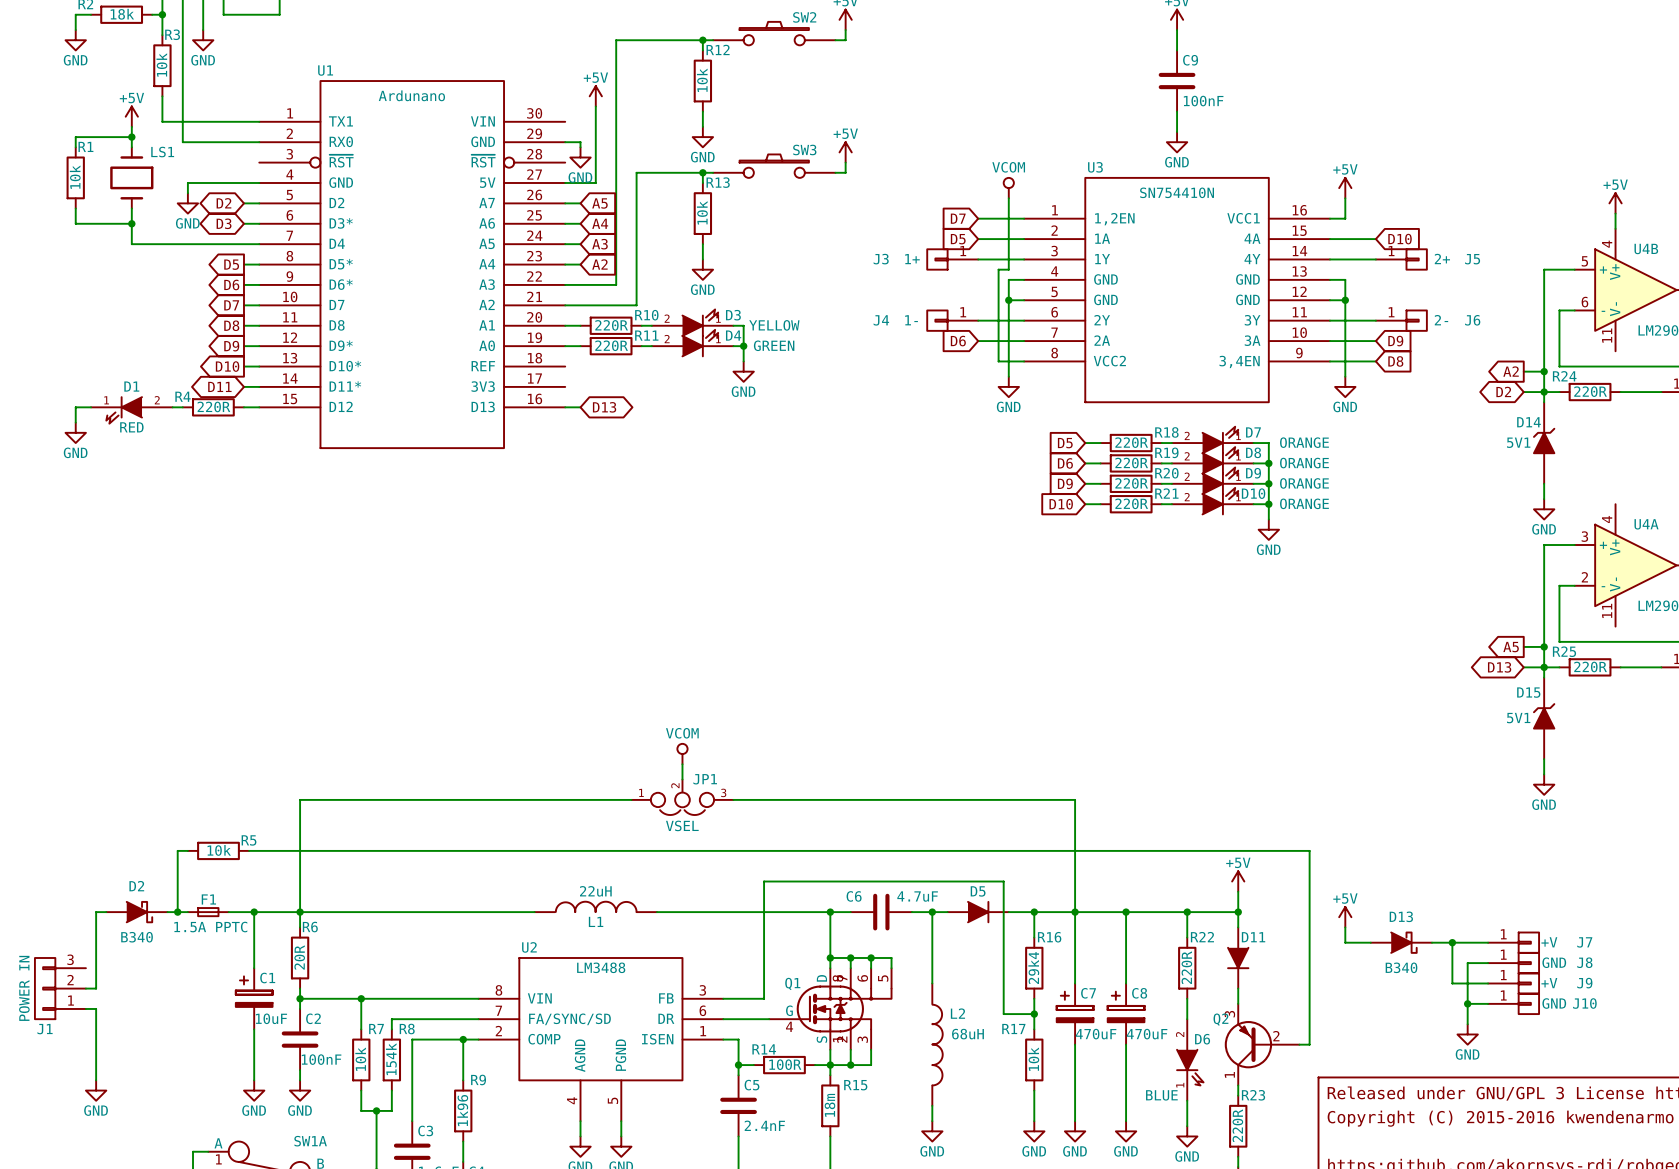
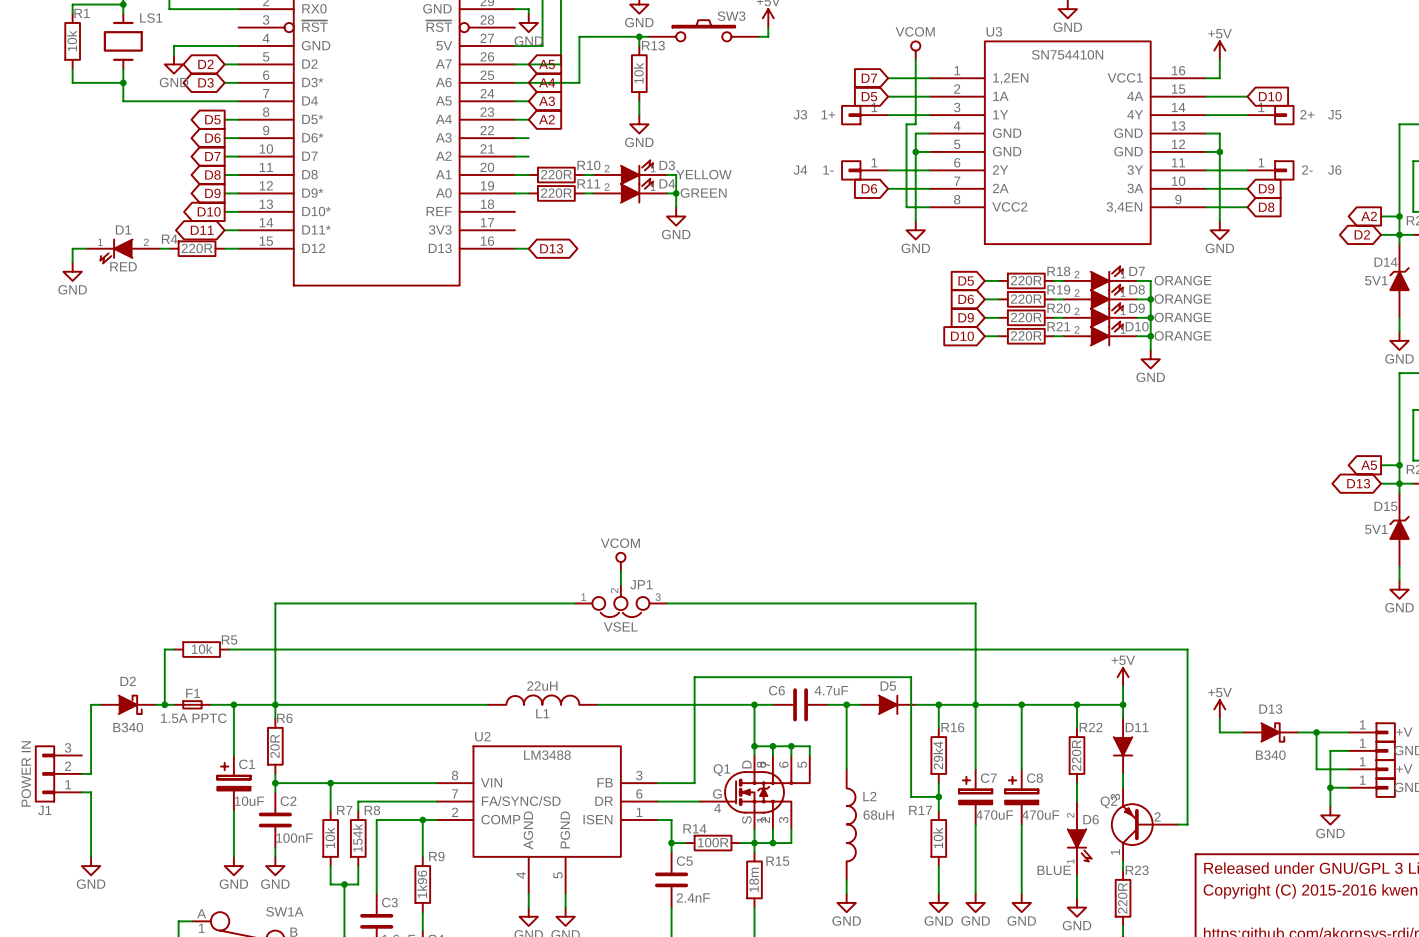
wire: (616, 203) (616, 284) (580, 284) -> (560, 64) (528, 64)
wire: (636, 223) (636, 305) (580, 305) -> (579, 82) (528, 82)

